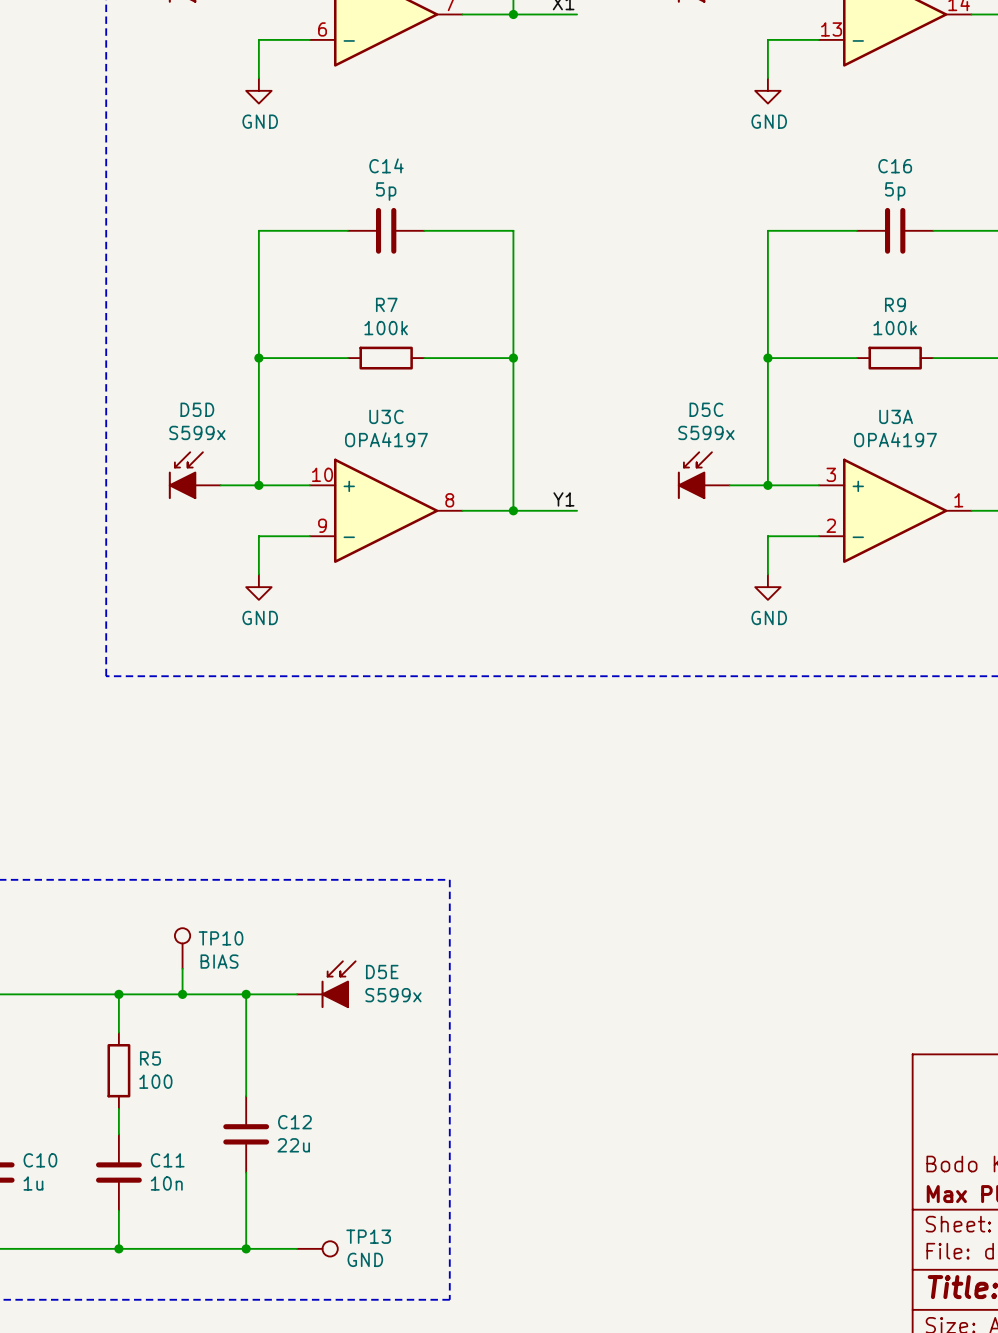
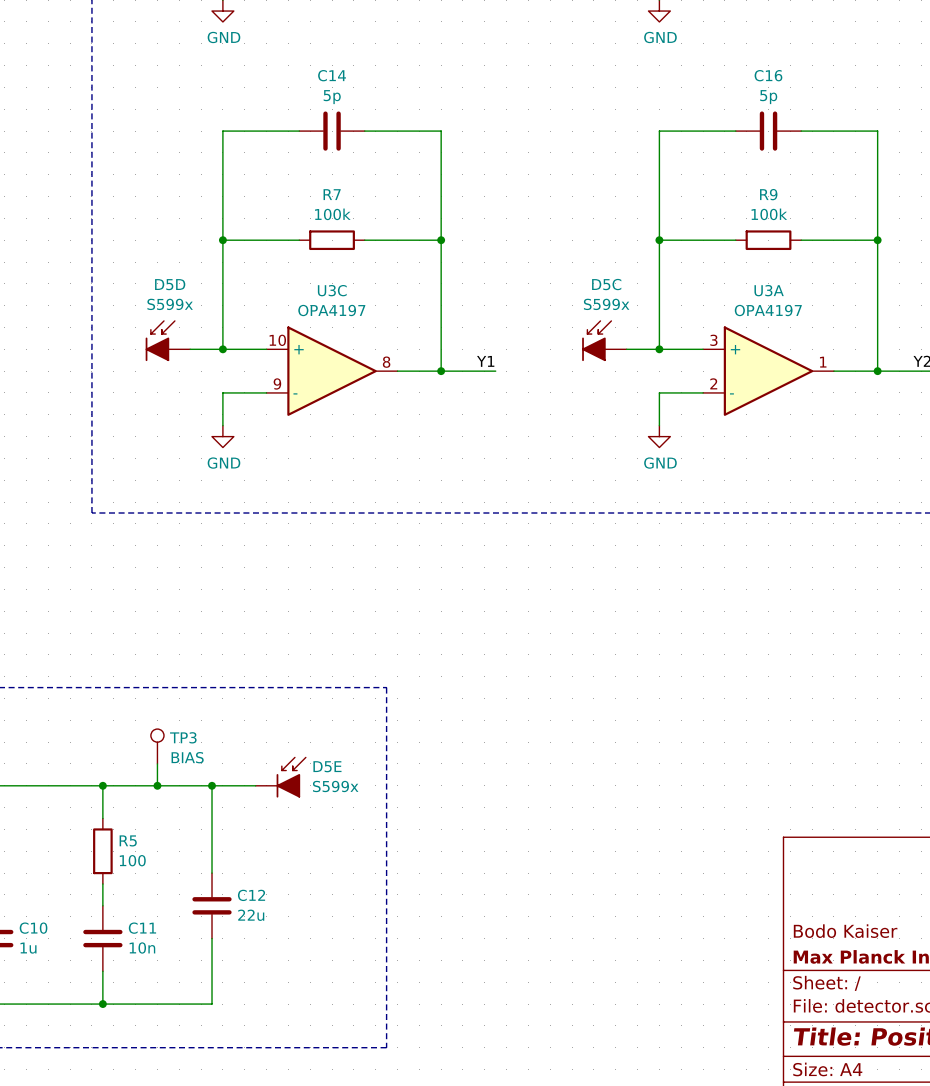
TP10 name: TP10 (221, 938) -> TP3 (183, 737)
wire: (246, 1248) (297, 1248) -> none
junction: (246, 1248) -> none
TP13: GND (317, 1248) -> none

